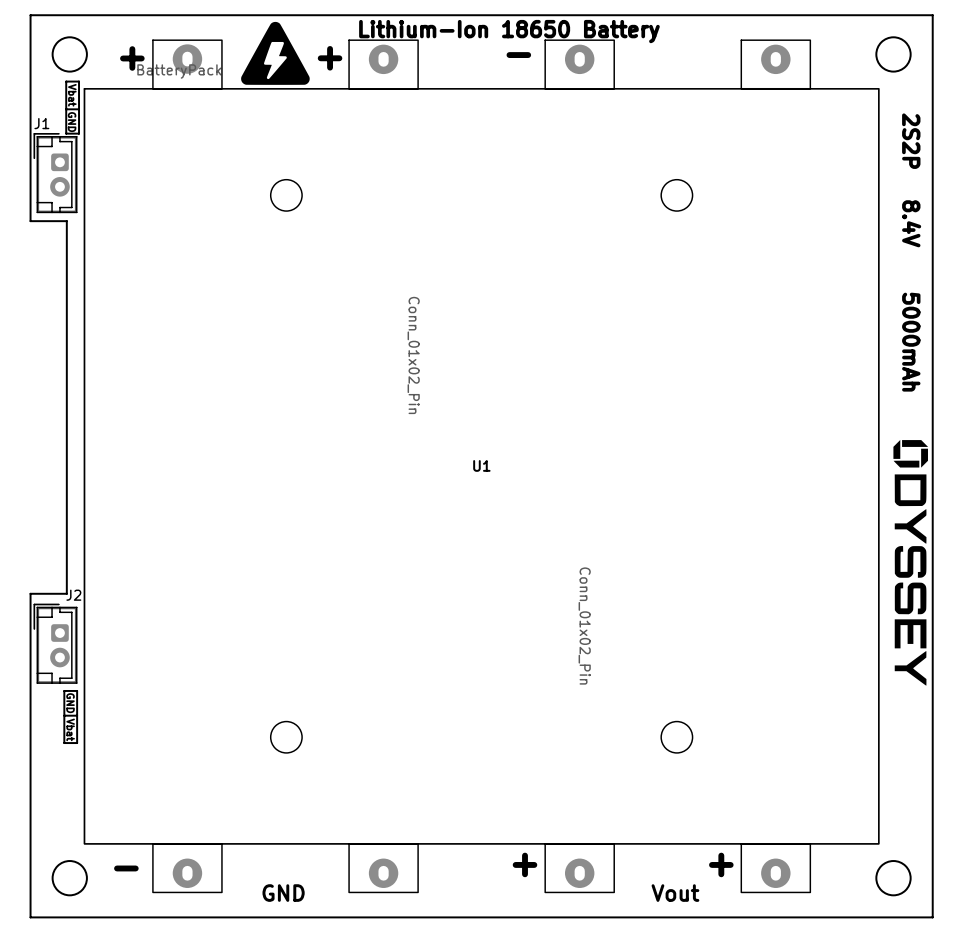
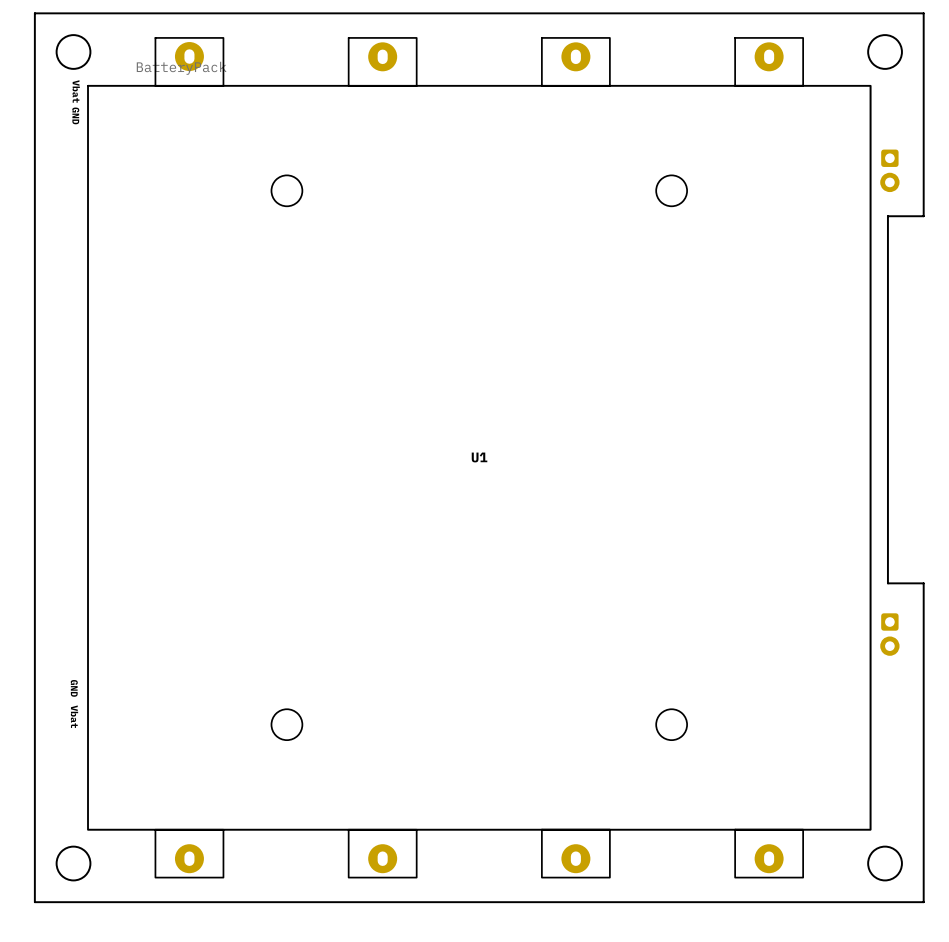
drawing: [241, 21, 310, 85] -> none
text: Lithium-Ion 18650 Battery (509, 31) -> none
text: - (518, 55) -> none
text: + (132, 58) -> none
text: + (330, 58) -> none
line: (79, 81) (66, 81) (66, 133) (79, 133) (79, 81) -> none
line: (78, 109) (66, 109) -> none
text: 2S2P (911, 141) -> none
J1: Conn_01x02_Pin (55, 173) -> none
part: none -> (889, 170)
board edge: (30, 221) (66, 221) (66, 593) (30, 593) -> (34, 216) (34, 583)
board edge: (932, 221) (932, 593) -> (923, 216) (887, 216) (887, 583) (923, 583)
text: 8.4V 5000mAh (911, 295) -> none
drawing: [893, 439, 929, 686] -> none
J2: Conn_01x02_Pin (55, 643) -> none
part: none -> (889, 634)
line: (77, 690) (64, 690) (64, 743) (77, 743) (77, 690) -> none
line: (77, 715) (64, 715) -> none
text: + (525, 864) -> none
text: + (721, 864) -> none
text: - (126, 868) -> none
text: GND (283, 893) -> none
text: Vout (675, 893) -> none

